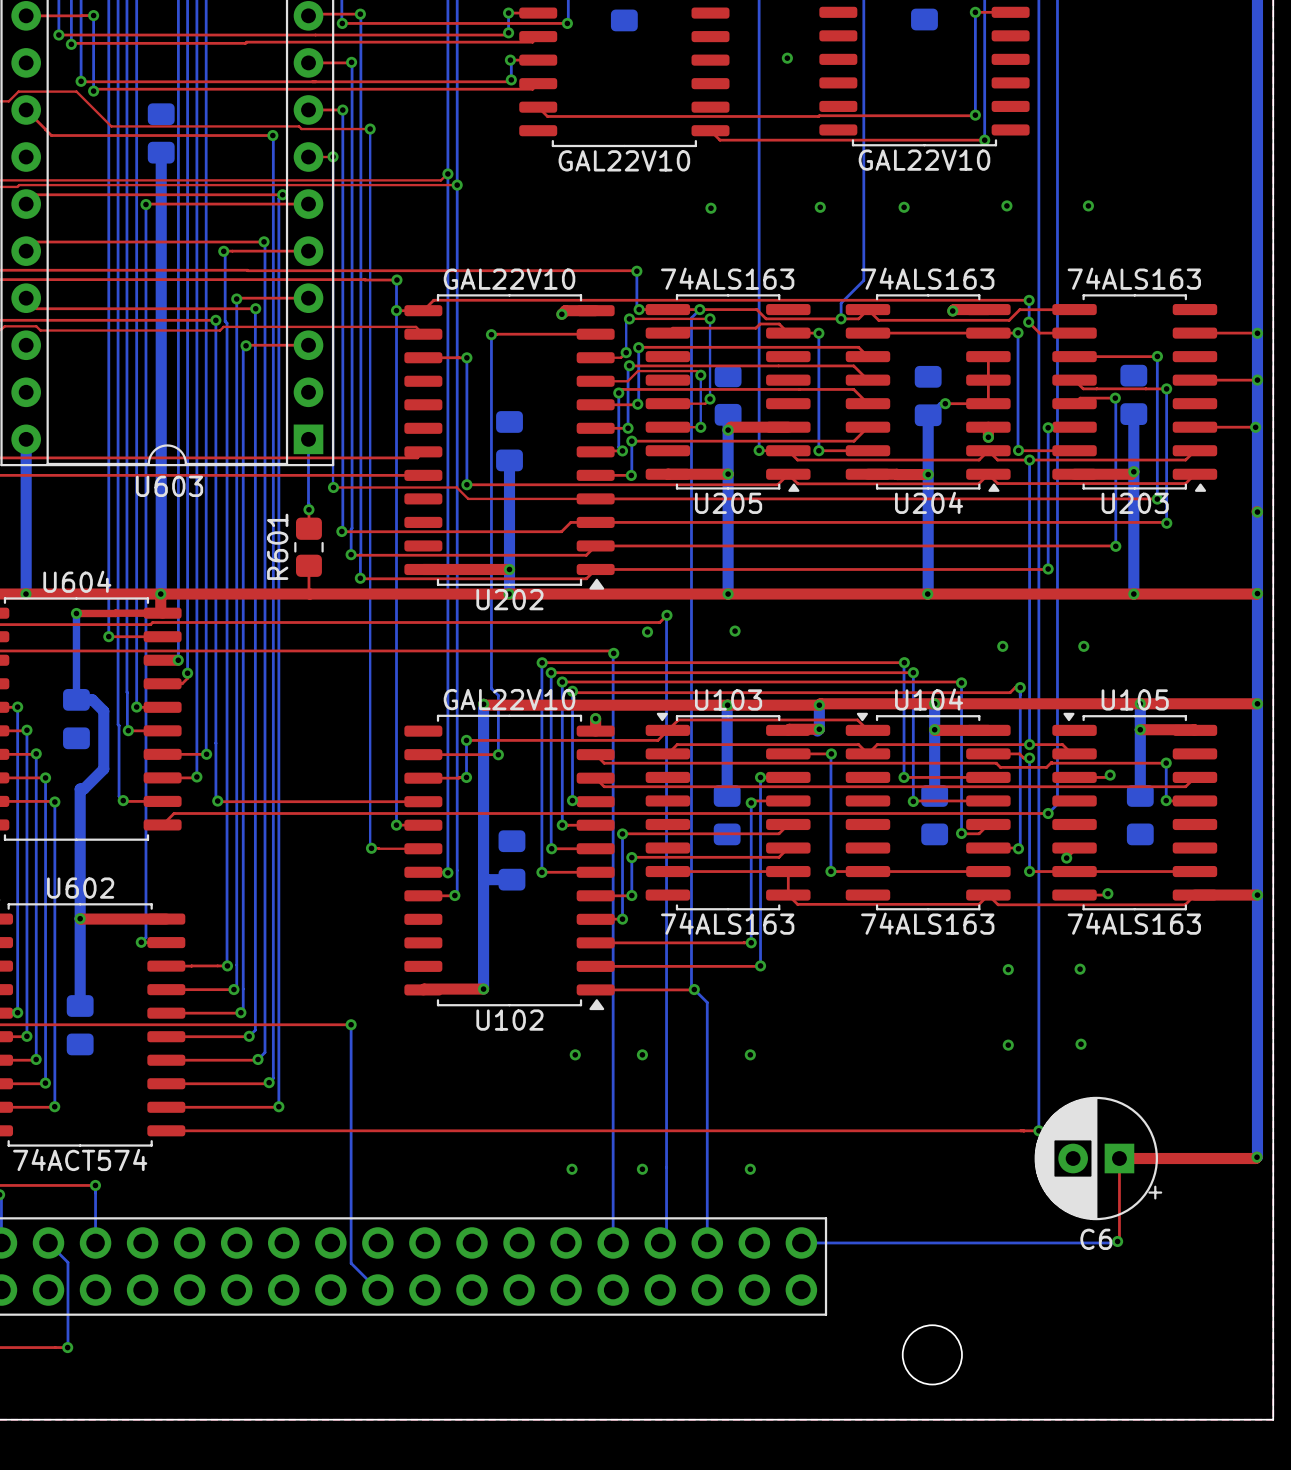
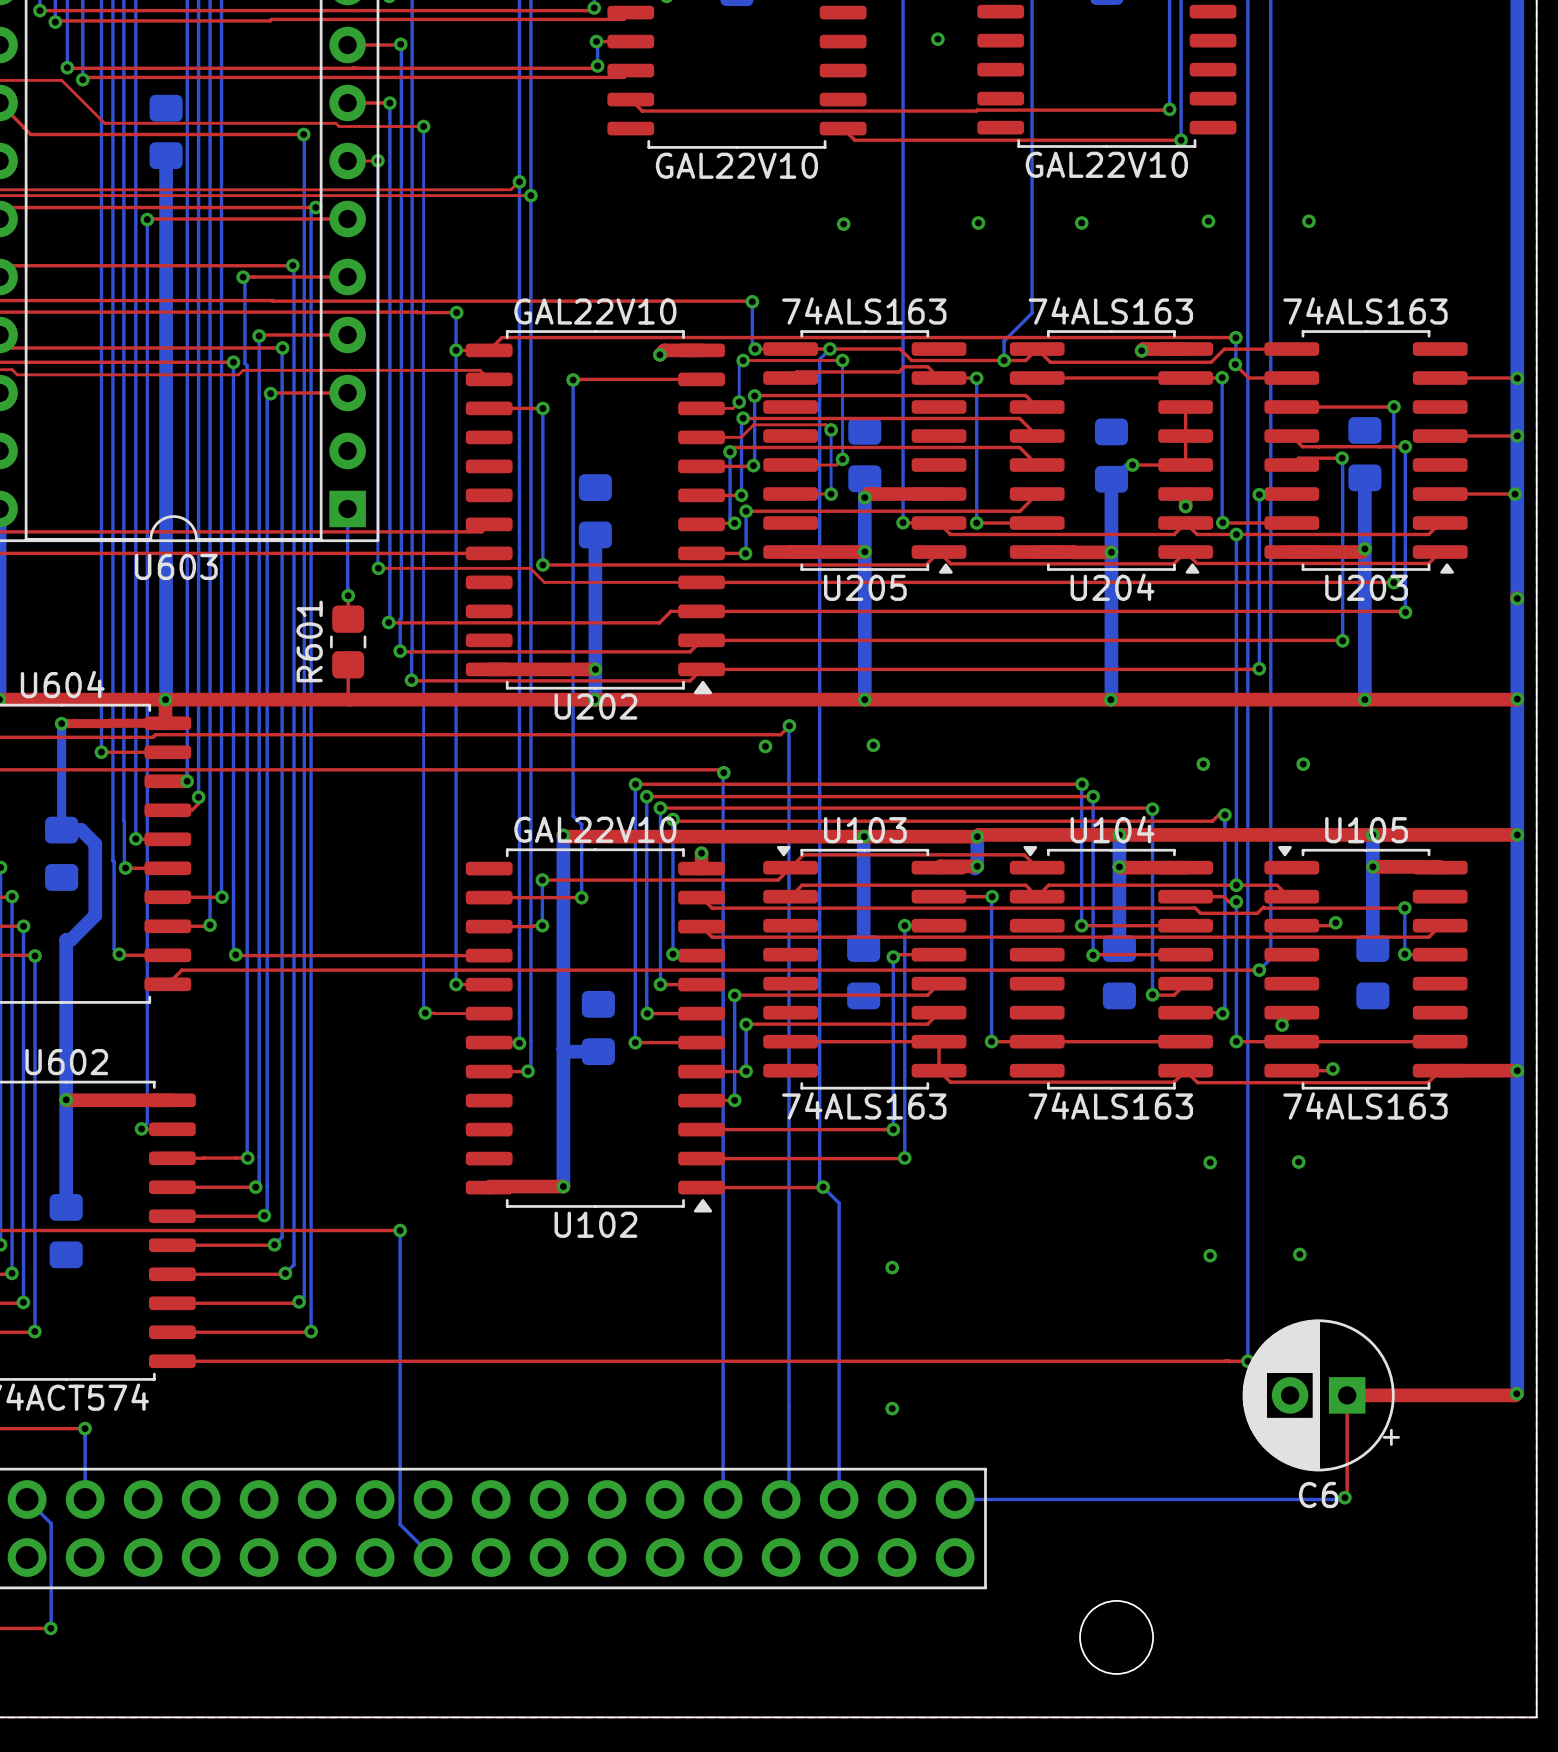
via: (575, 1054) -> none
via: (642, 1054) -> none
via: (572, 1169) -> none
via: (642, 1169) -> none

